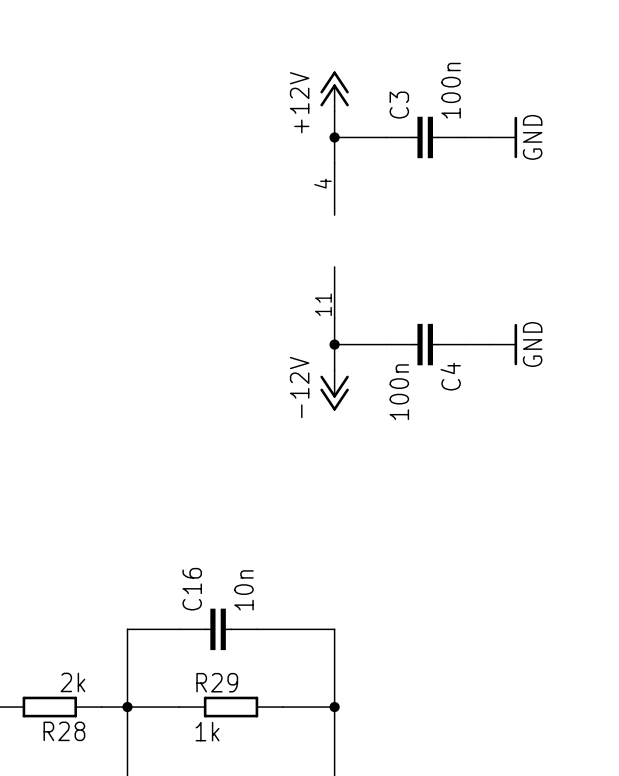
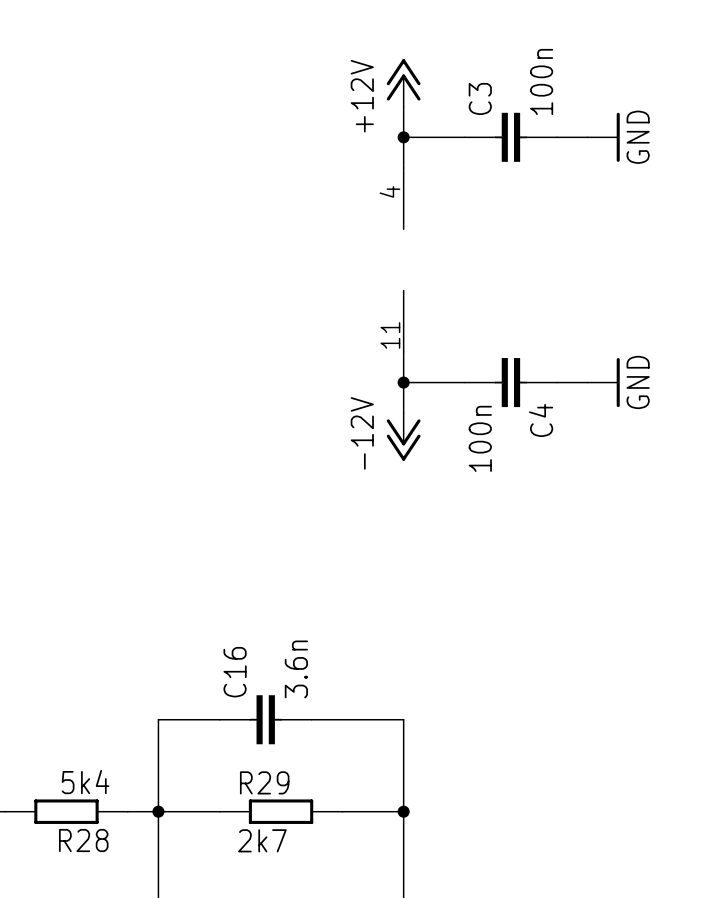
C16 value: 10n (243, 590) -> 3.6n (296, 669)
R28 value: 2k (72, 682) -> 5k4 (85, 782)
R29 value: 1k (207, 731) -> 2k7 (262, 840)

